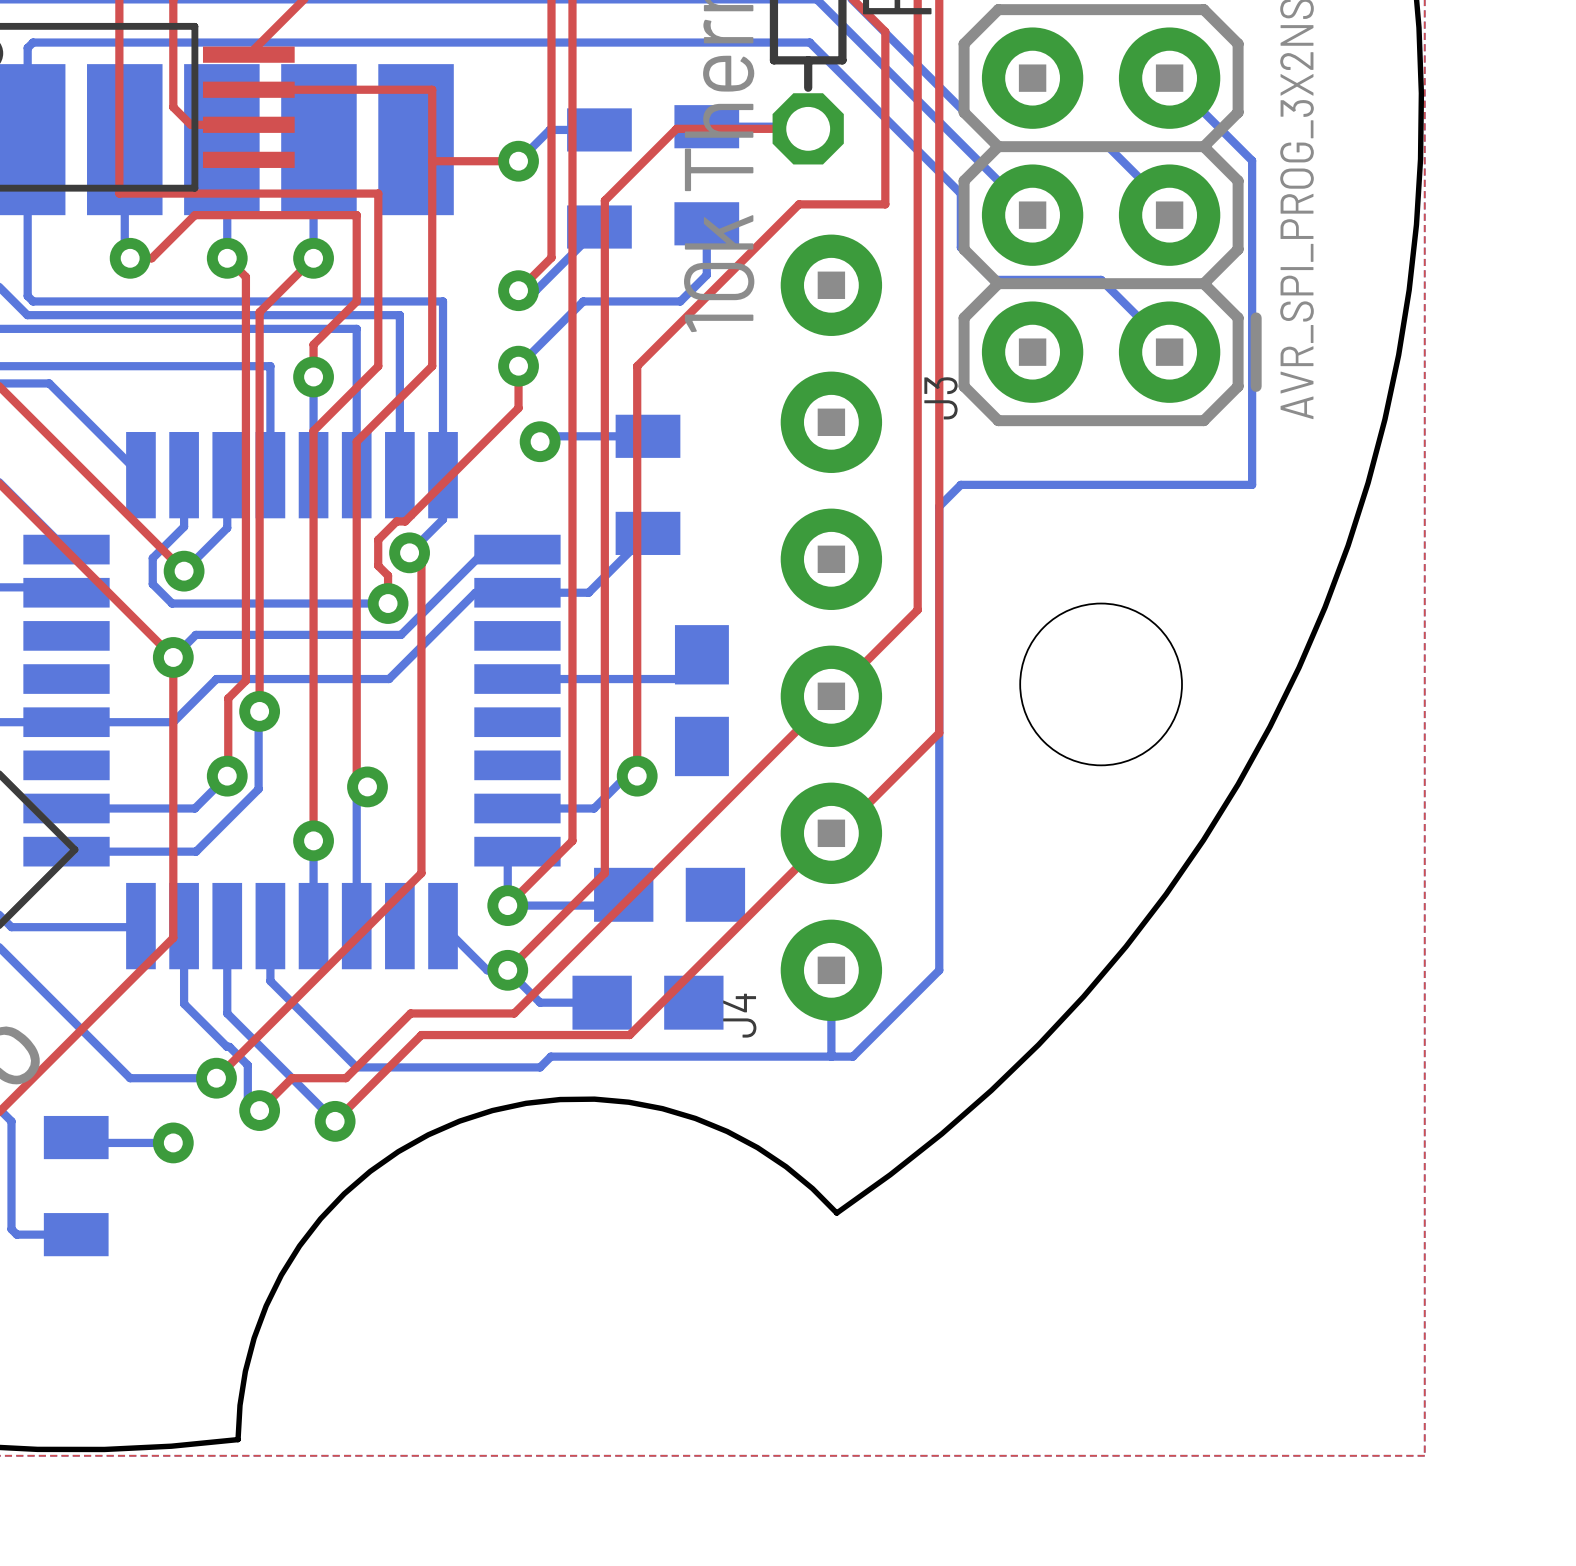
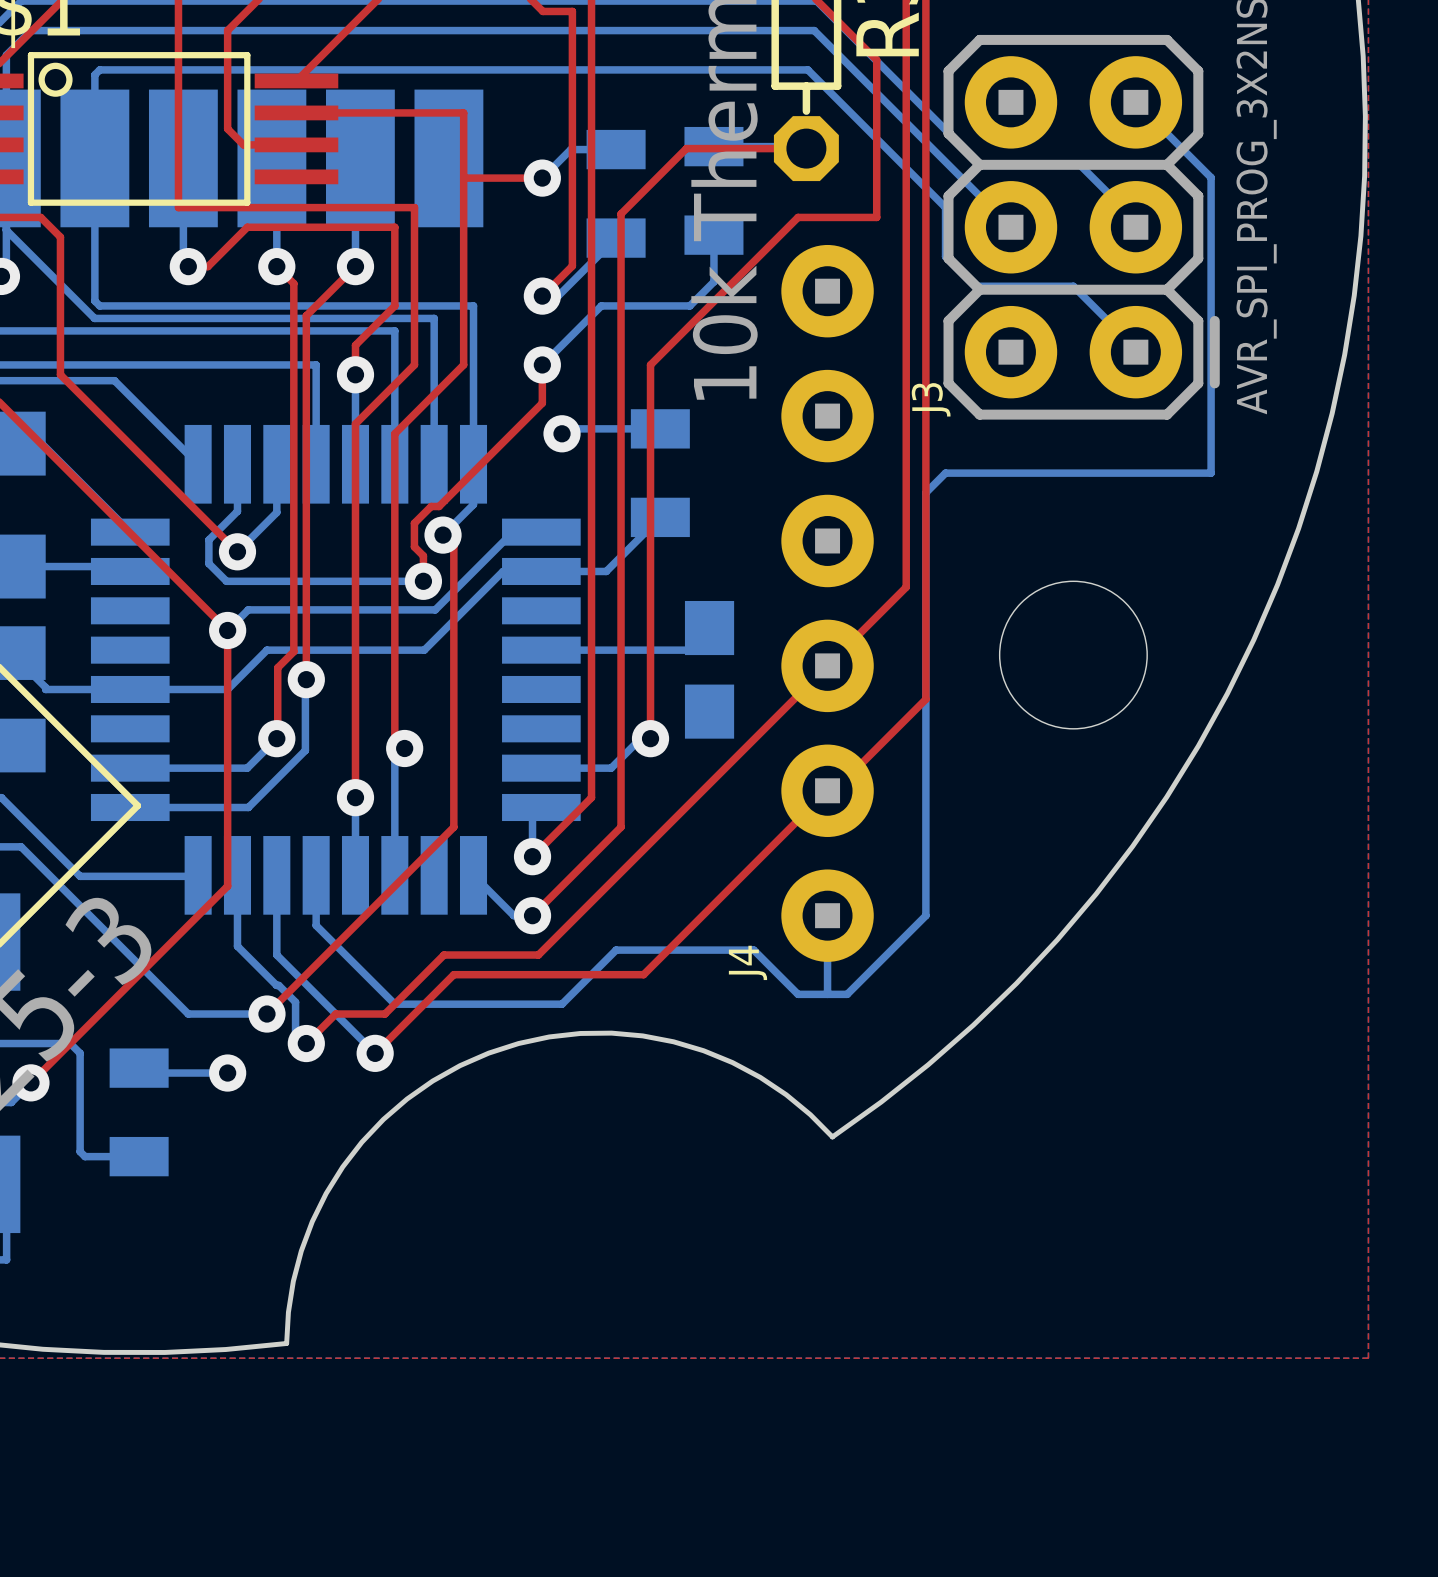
bottom track: (623, 894) (612, 905) (507, 905) -> none
part: (669, 894) -> none
bottom track: (507, 970) (540, 1002) (602, 1002) -> none
part: (647, 1002) -> none
bottom track: (550, 1056) (799, 1056) -> (571, 994) (616, 950) (753, 950) (798, 994)

